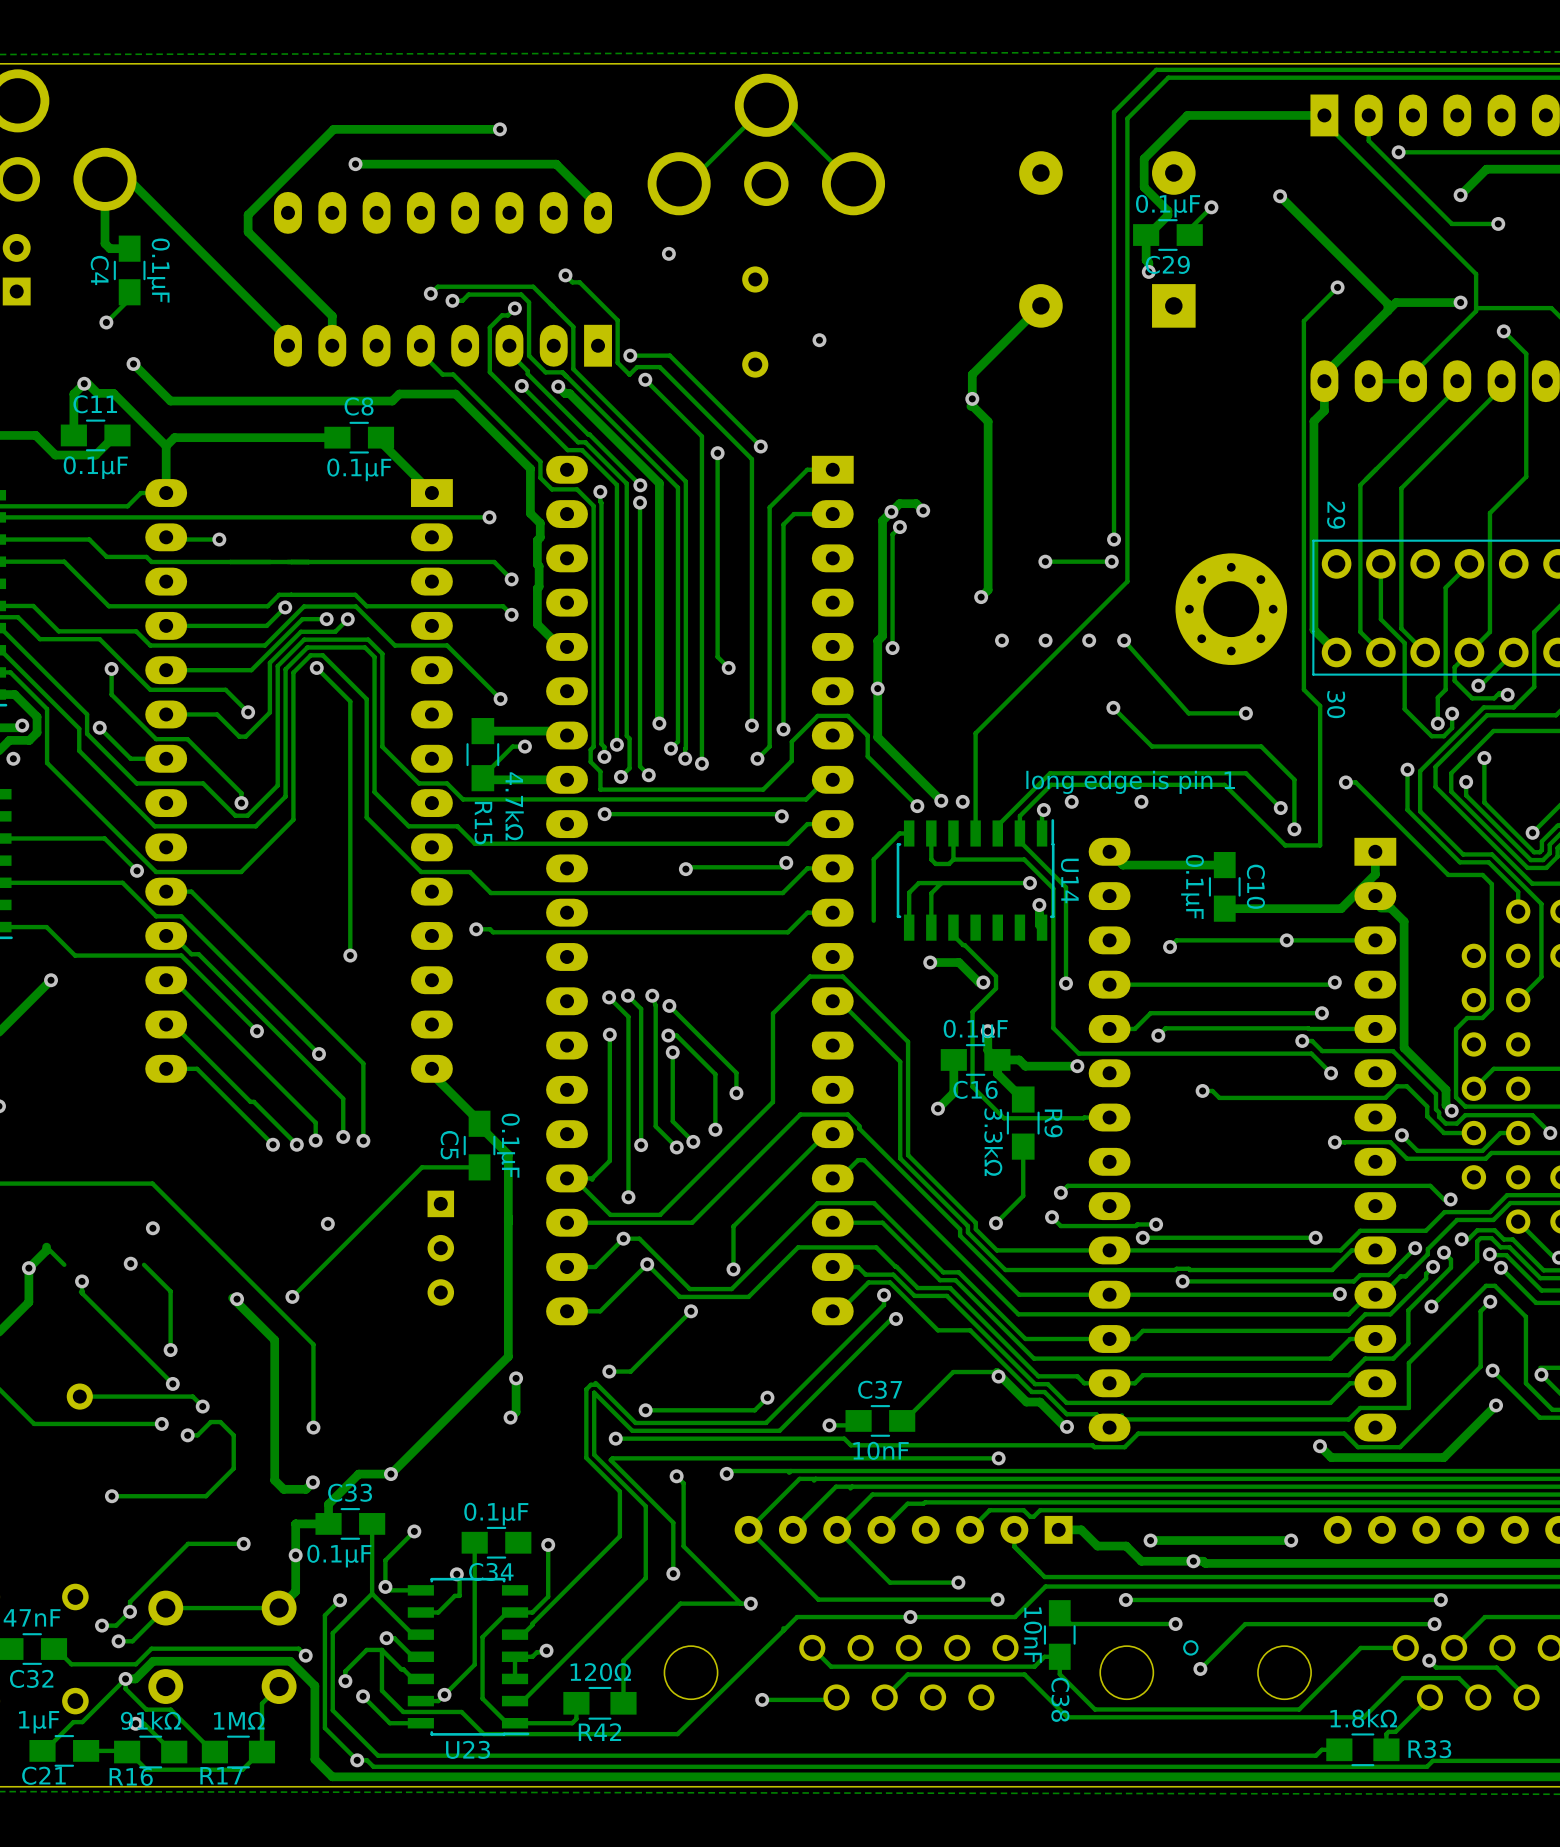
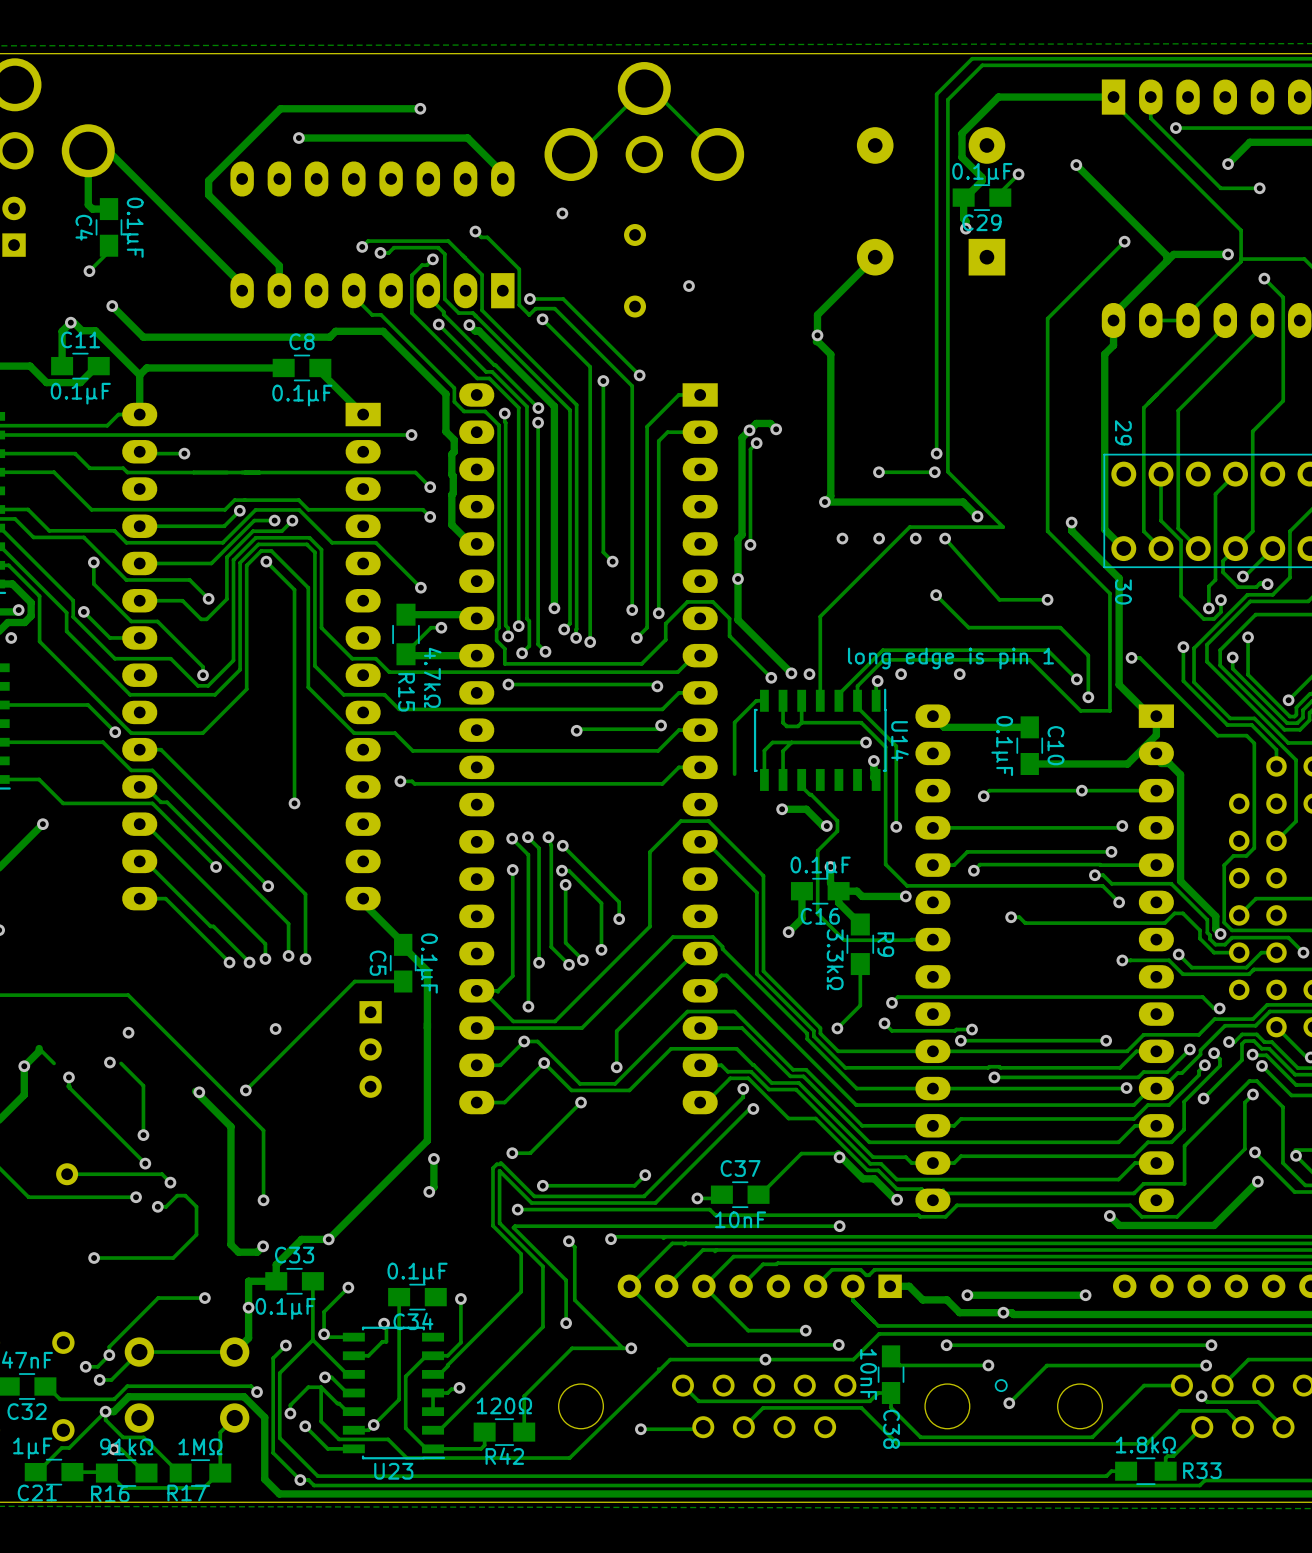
track: (1303, 321) (1303, 689) -> (1096, 269) (1047, 318) (1047, 531) (1096, 579)
track: (1127, 561) (1127, 581) (1082, 626) -> (947, 471) (1003, 527) (909, 527)
track: none -> (824, 502) (963, 502) (977, 516)
part: (1231, 609) -> none
via: none -> (977, 516)
track: none -> (1071, 522) (1071, 530) (1119, 578) (1119, 684) (1150, 716)
via: none -> (1071, 522)

